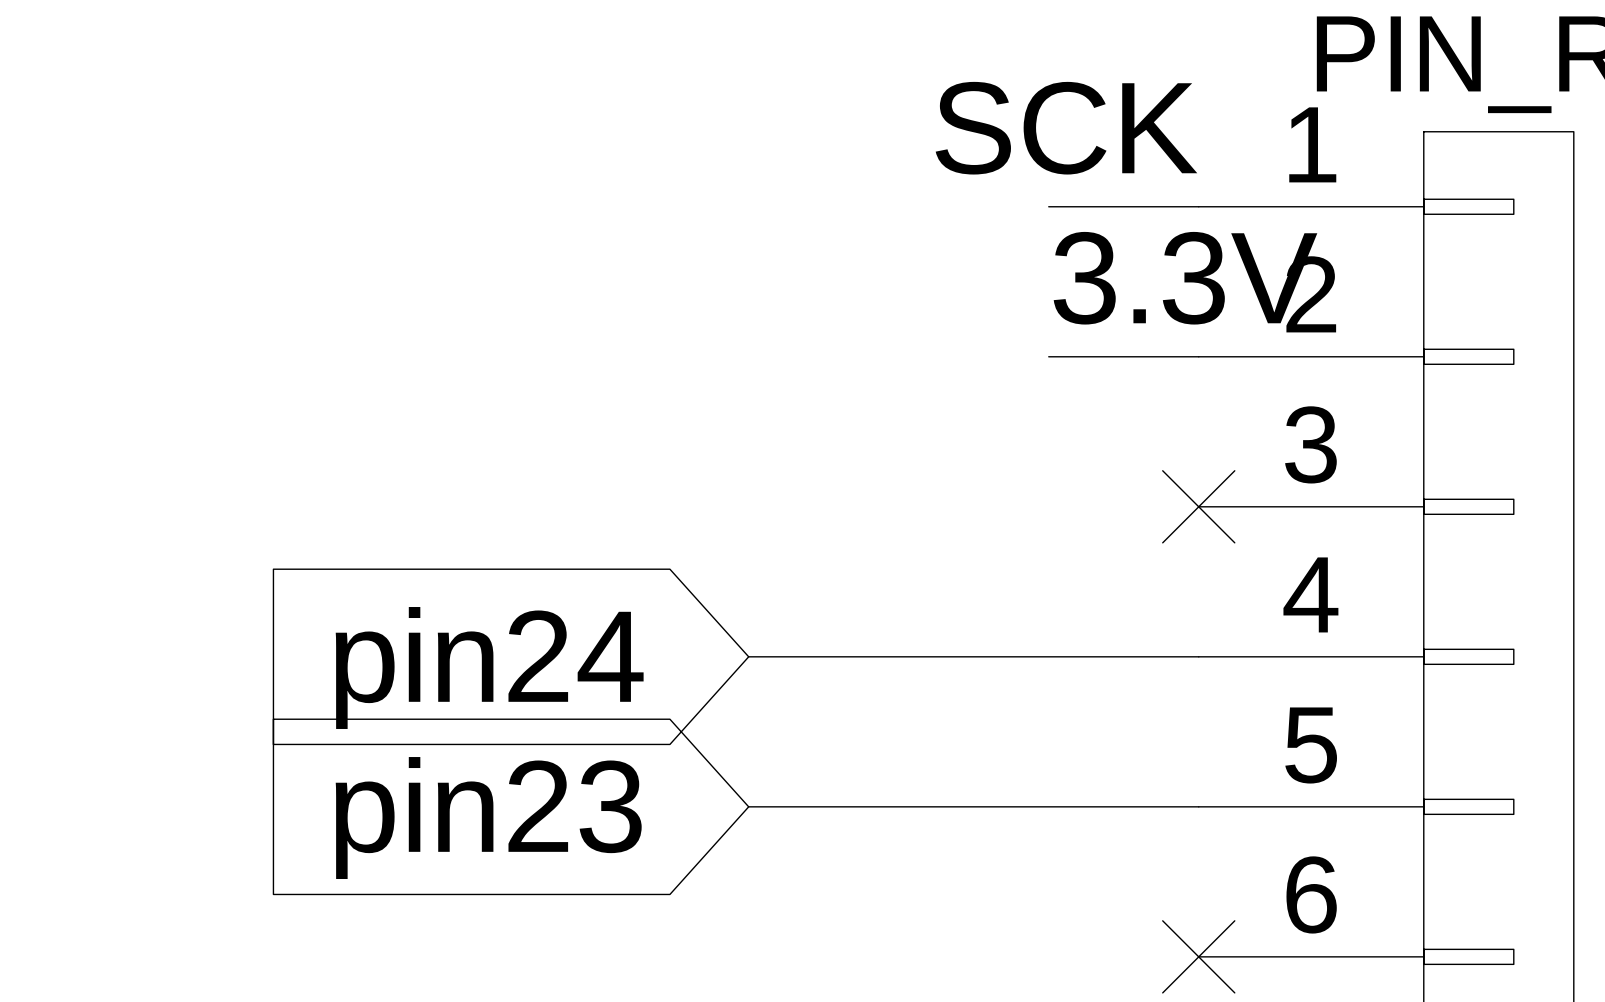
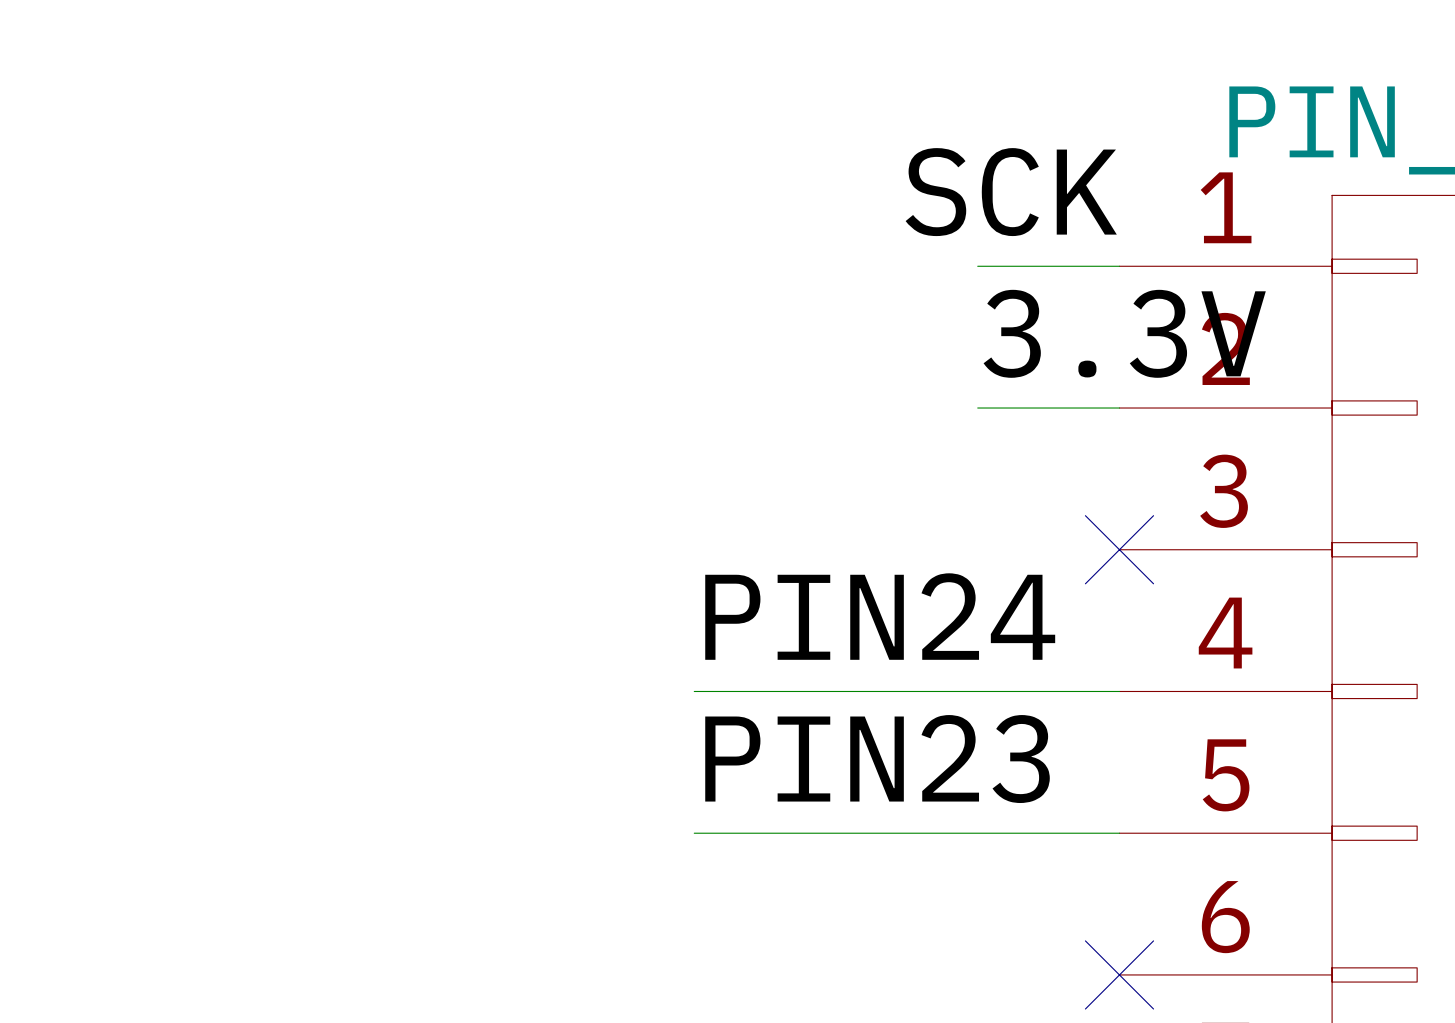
label: none -> PIN24 (880, 616)
global label: pin24 (489, 667) -> none
label: none -> PIN23 (877, 759)
global label: pin23 (488, 818) -> none

